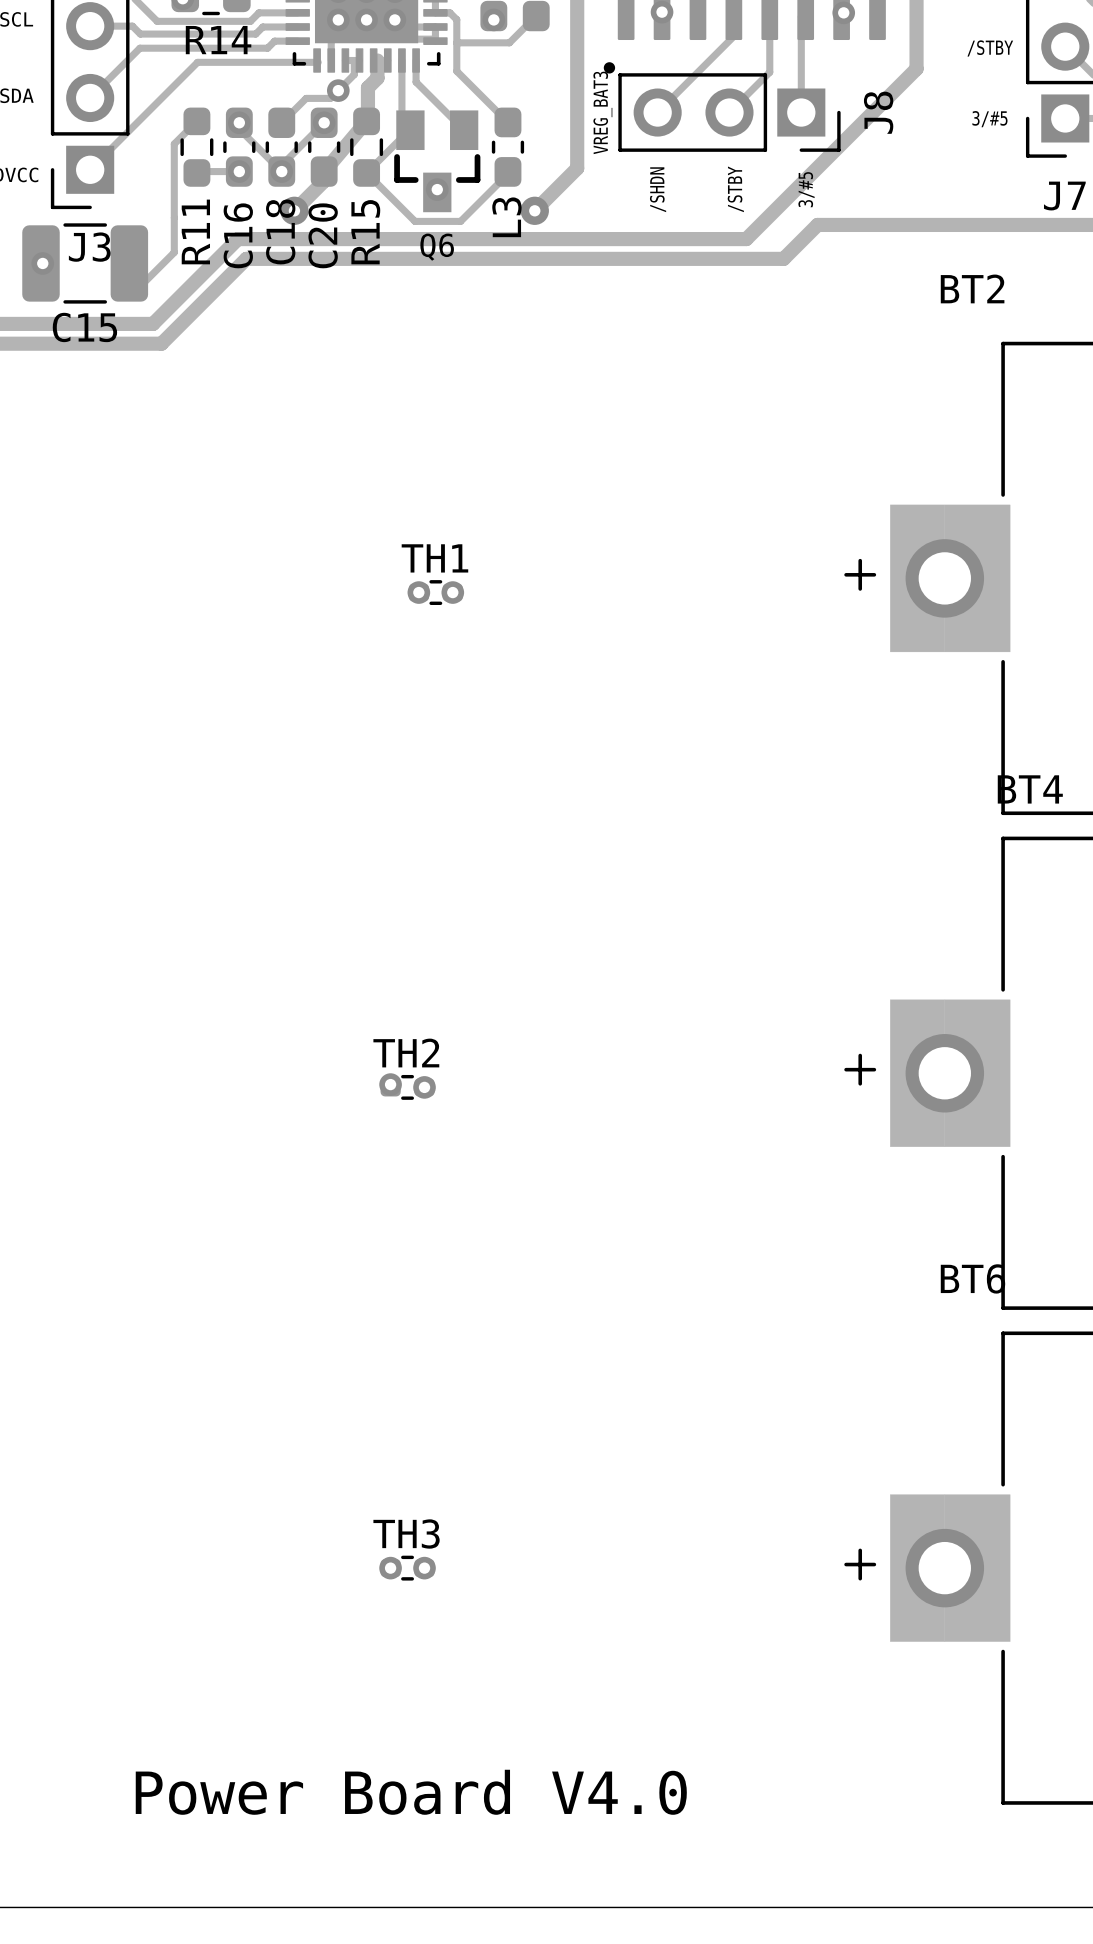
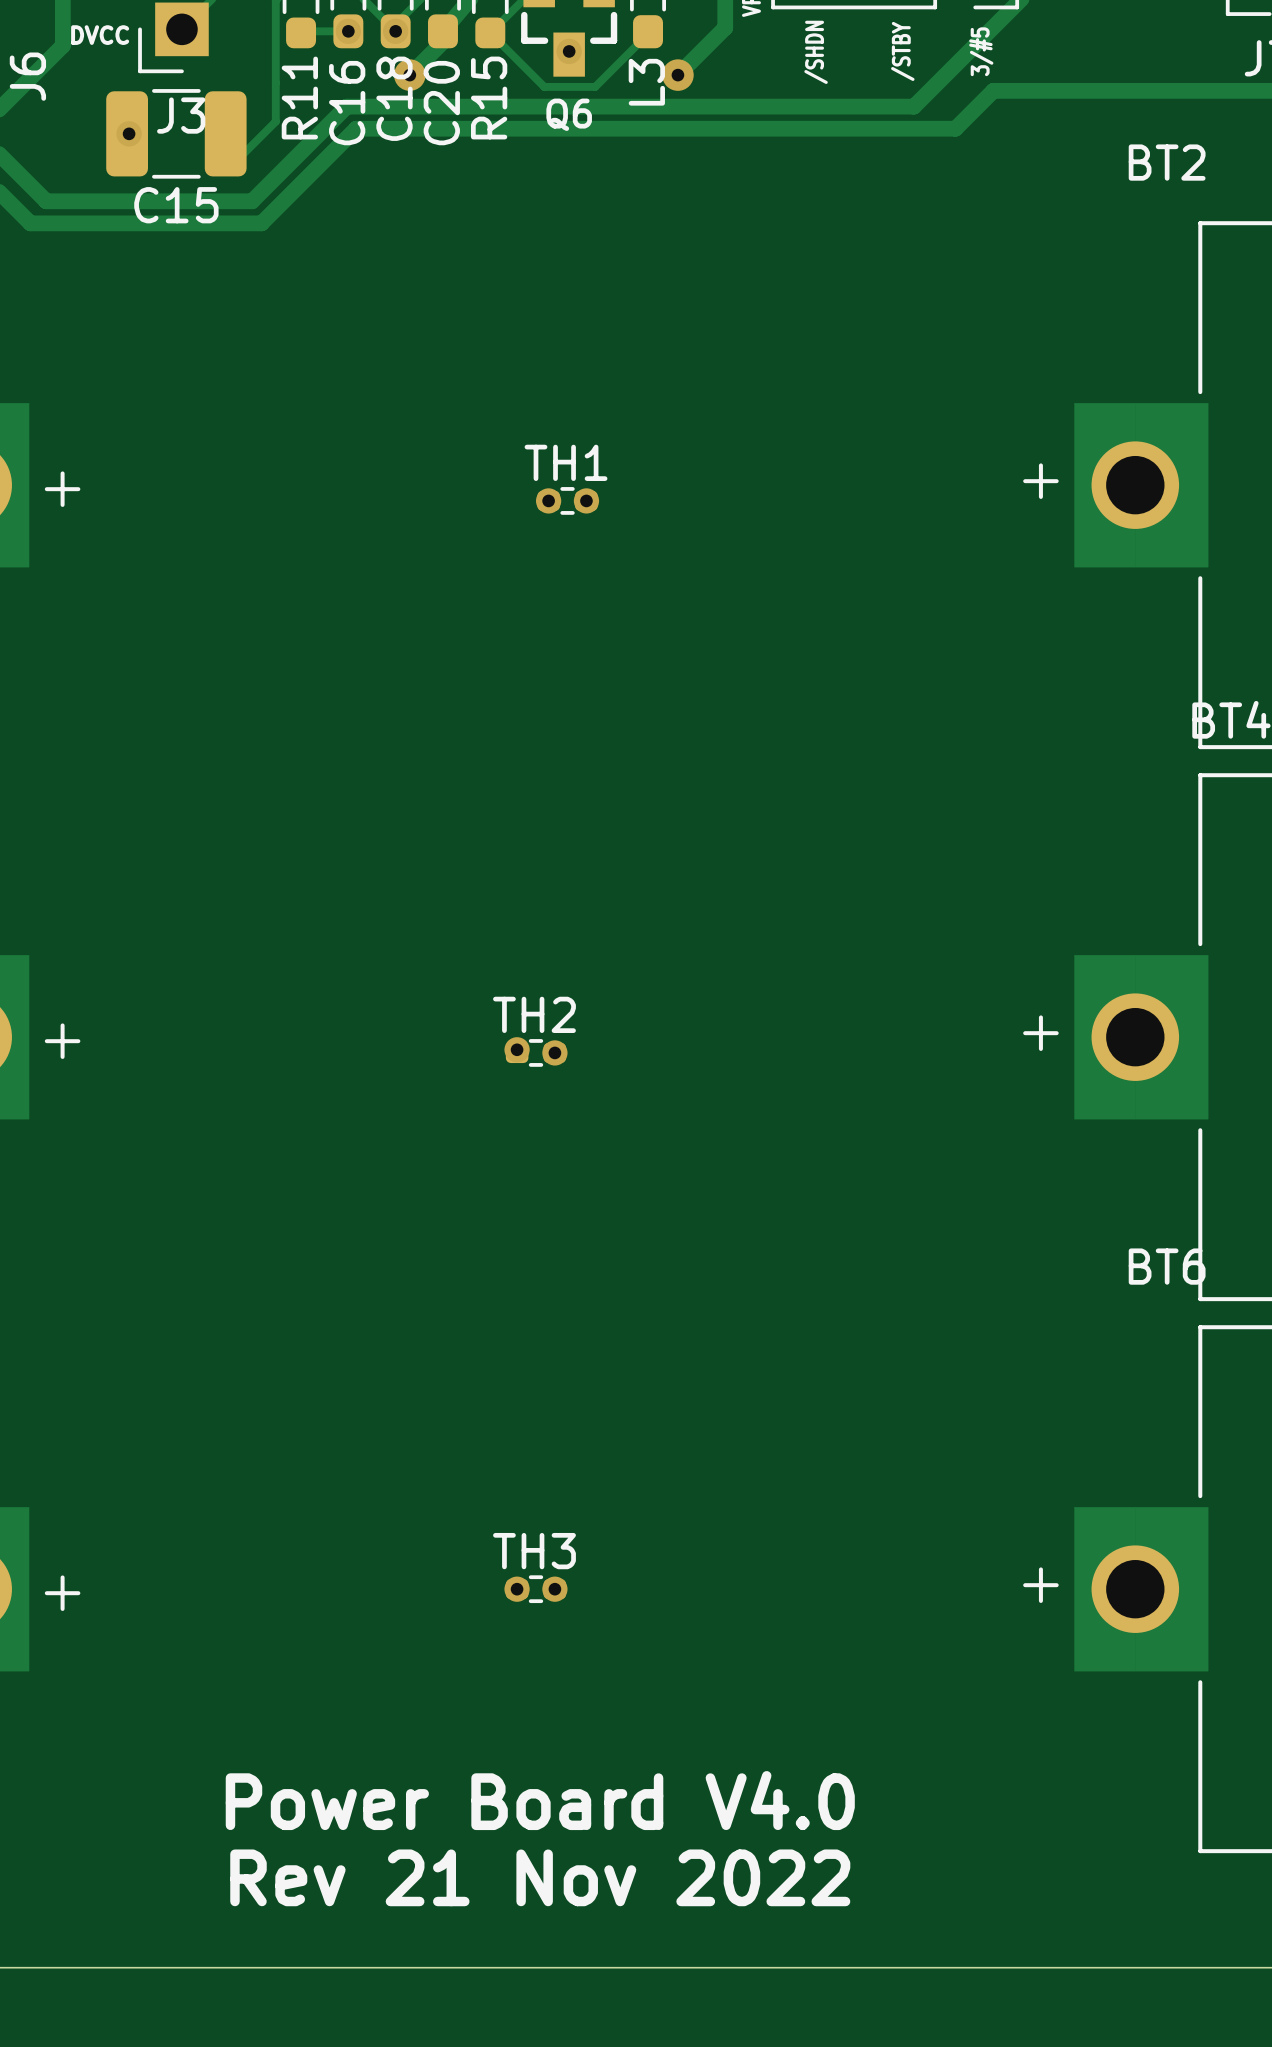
text position: Power Board V4.0 (411, 1792) -> Power Board V4.0 (540, 1800)
text: none -> Rev 21 Nov 2022 (540, 1877)

